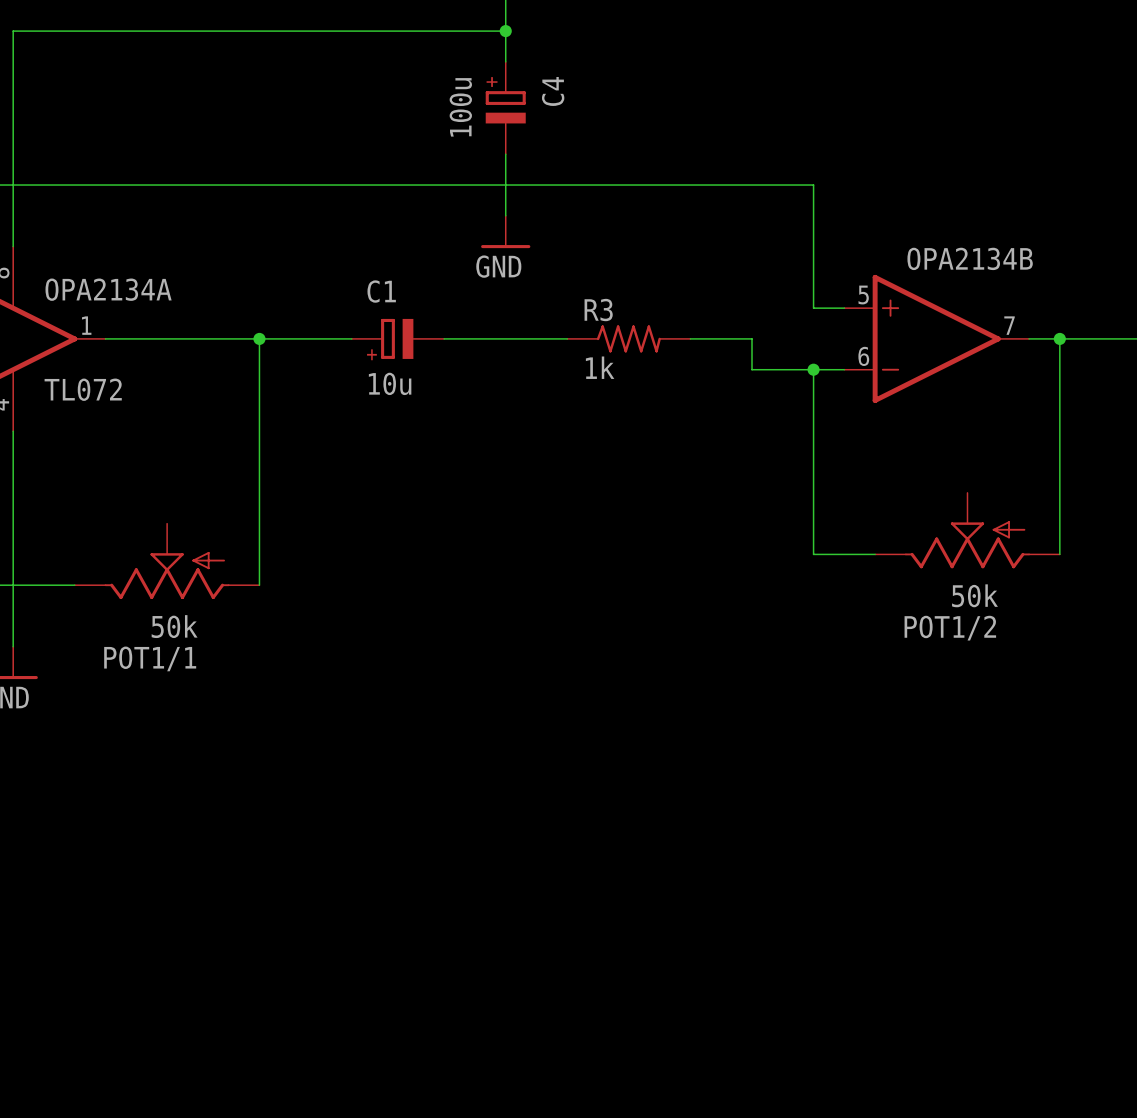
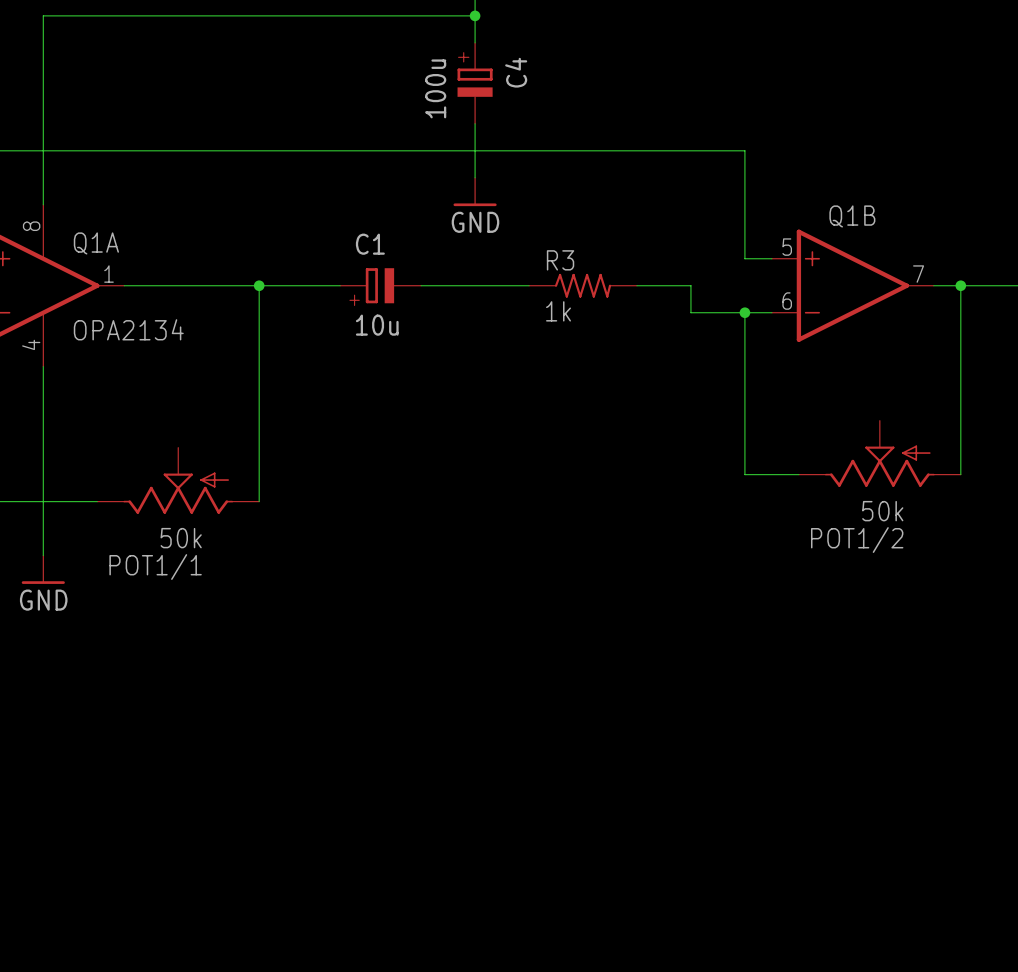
OPA2134B name: OPA2134B (970, 258) -> Q1B (852, 216)
OPA2134A name: OPA2134A (108, 289) -> Q1A (96, 243)
OPA2134A text: TL072 (83, 389) -> OPA2134 (128, 329)

